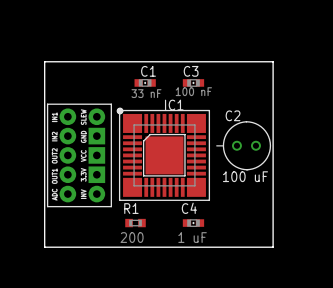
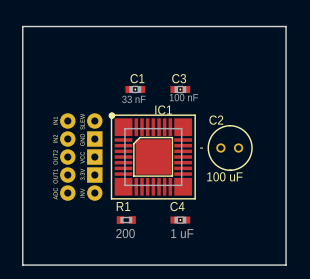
board edge: (44, 61) (273, 61) (273, 247) (44, 247) (44, 61) -> (22, 26) (22, 265) (286, 265) (286, 26) (22, 26)
part: (79, 155) -> none
part: none -> (81, 157)

